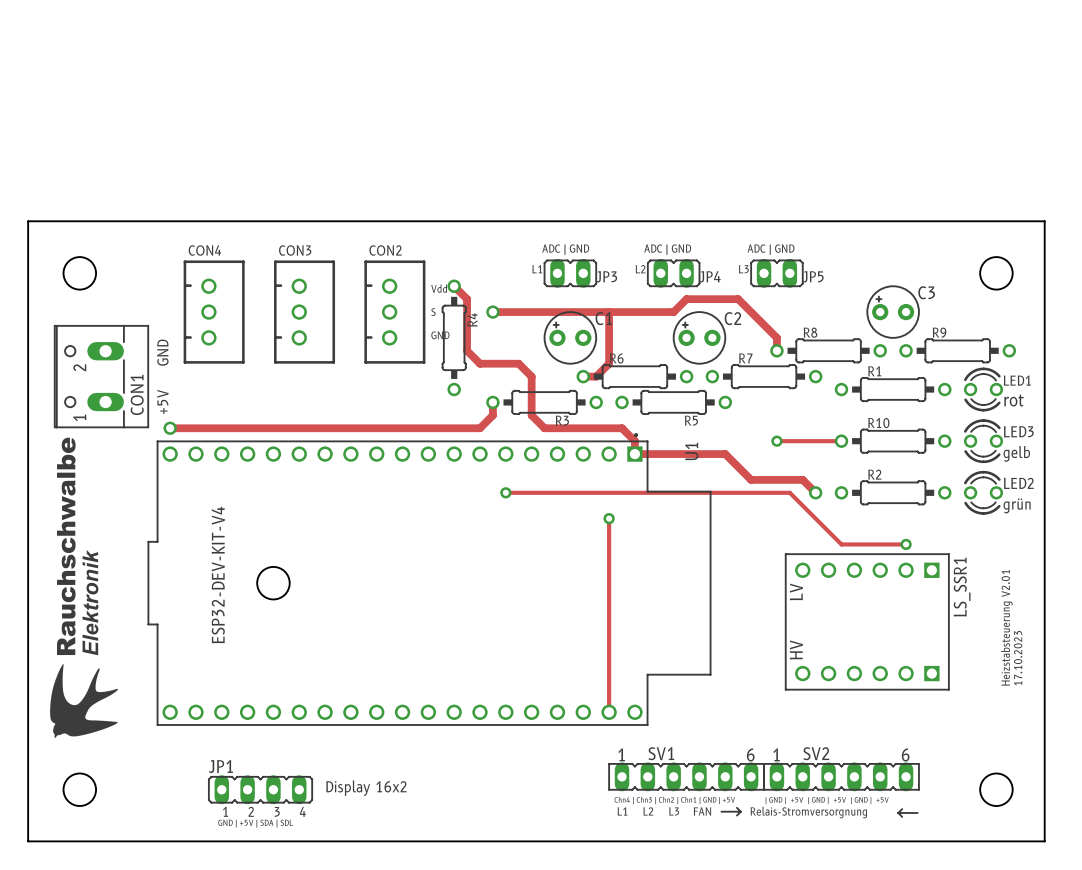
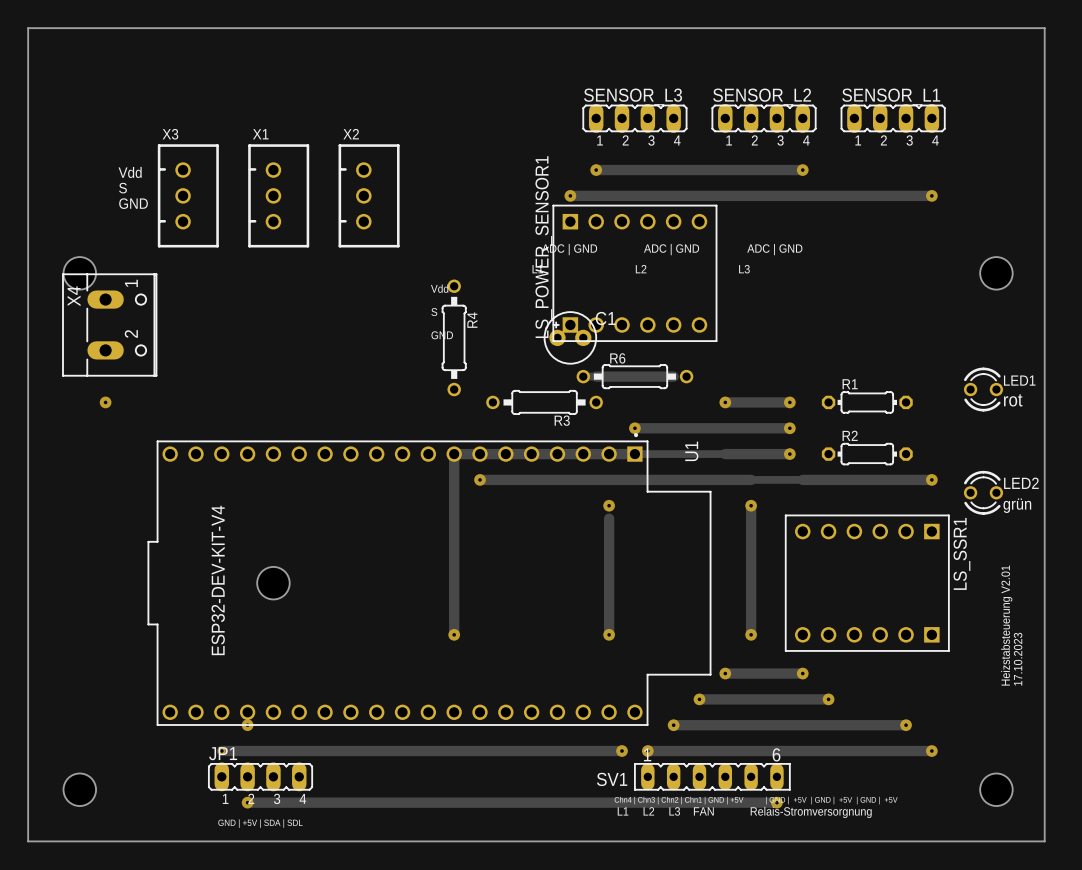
SENSOR_L3: none -> (634, 118)
SENSOR_L2: none -> (764, 118)
SENSOR_L1: none -> (893, 118)
track: none -> (596, 170) (802, 170)
via: none -> (596, 170)
via: none -> (802, 170)
text: none -> Vdd (130, 172)
text: none -> S (123, 188)
X3: none -> (188, 195)
X1: none -> (278, 195)
X2: none -> (369, 195)
track: none -> (570, 195) (931, 195)
via: none -> (570, 195)
via: none -> (931, 195)
board edge: (28, 221) (1044, 221) -> (28, 221) (28, 28) (1044, 28) (1044, 221)
JP3: (570, 273) -> none
LS_POWER_SENSOR1: none -> (634, 273)
JP4: (673, 273) -> none
JP5: (776, 273) -> none
track: (454, 286) (467, 299) (467, 350) (480, 363) (518, 363) (531, 376) (531, 415) (544, 428) (622, 428) (634, 441) (634, 454) -> (454, 634) (454, 454) (634, 454)
CON4: (214, 312) -> none
CON3: (304, 312) -> none
CON2: (394, 312) -> none
track: (492, 312) (673, 312) (686, 299) (738, 299) (776, 337) (776, 350) -> none
via: (492, 312) -> none
track: (609, 312) (609, 363) (596, 376) -> (673, 376) (596, 376)
C3: (893, 312) -> none
X4: none -> (109, 325)
C2: (699, 337) -> none
R8: (828, 350) -> none
R9: (957, 350) -> none
text rotation: 0° (162, 352) -> 90° clockwise (133, 203)
text position: GND (162, 352) -> GND (133, 203)
CON1: (101, 376) -> none
R7: (764, 376) -> none
R1 footprint: [834, 377, 952, 402] -> [821, 391, 913, 414]
text: +5V (162, 401) -> none
via: none -> (105, 402)
track: (492, 402) (492, 415) (480, 428) (170, 428) -> none
R5: (673, 402) -> none
via: none -> (725, 402)
via: none -> (789, 402)
via: (170, 428) -> none
track: none -> (634, 428) (789, 428)
via: none -> (634, 428)
via: none -> (789, 428)
drawing: [50, 437, 119, 738] -> none
track: (776, 441) (841, 441) -> (725, 402) (789, 402)
via: (776, 441) -> none
R10: (893, 441) -> none
LED3: gelb (983, 441) -> none
track: (725, 454) (751, 479) -> (725, 454) (789, 454)
via: none -> (789, 454)
track: none -> (480, 479) (751, 479)
via: none -> (480, 479)
track: (802, 479) (815, 492) -> (802, 479) (931, 479)
via: none -> (931, 479)
R2 footprint: [834, 480, 952, 506] -> [821, 442, 913, 466]
track: (505, 492) (789, 492) (841, 544) (906, 544) -> none
via: (505, 492) -> none
via: (815, 492) -> none
via: none -> (609, 505)
track: none -> (751, 505) (751, 634)
via: none -> (751, 505)
track width: thin (609, 518) (609, 634) -> thick (609, 518) (609, 634)
via: (609, 518) -> none
via: (906, 544) -> none
LS_SSR1 footprint: [785, 553, 950, 691] -> [785, 514, 950, 652]
via: none -> (454, 634)
track: (609, 634) (609, 712) -> none
via: none -> (609, 634)
via: none -> (751, 634)
track: none -> (725, 673) (802, 673)
via: none -> (725, 673)
via: none -> (802, 673)
track: none -> (699, 699) (828, 699)
via: none -> (699, 699)
via: none -> (828, 699)
via: none -> (247, 725)
track: none -> (673, 725) (906, 725)
via: none -> (673, 725)
via: none -> (906, 725)
track: none -> (221, 751) (622, 751)
via: none -> (221, 751)
via: none -> (622, 751)
track: none -> (647, 751) (931, 751)
via: none -> (647, 751)
via: none -> (931, 751)
SV1 name position: SV1 (661, 753) -> SV1 (612, 779)
SV1 footprint: [608, 762, 765, 792] -> [634, 763, 791, 791]
SV2: (841, 776) -> none
JP1 value: Display 16x2 (366, 788) -> none
JP1 position: (260, 789) -> (260, 776)
track: none -> (247, 802) (776, 802)
via: none -> (247, 802)
via: none -> (776, 802)
line: (736, 807) (740, 811) -> none
line: (902, 809) (898, 812) -> none
line: (721, 811) (740, 811) -> none
line: (740, 811) (736, 815) -> none
line: (898, 812) (917, 812) -> none
line: (898, 812) (902, 816) -> none

